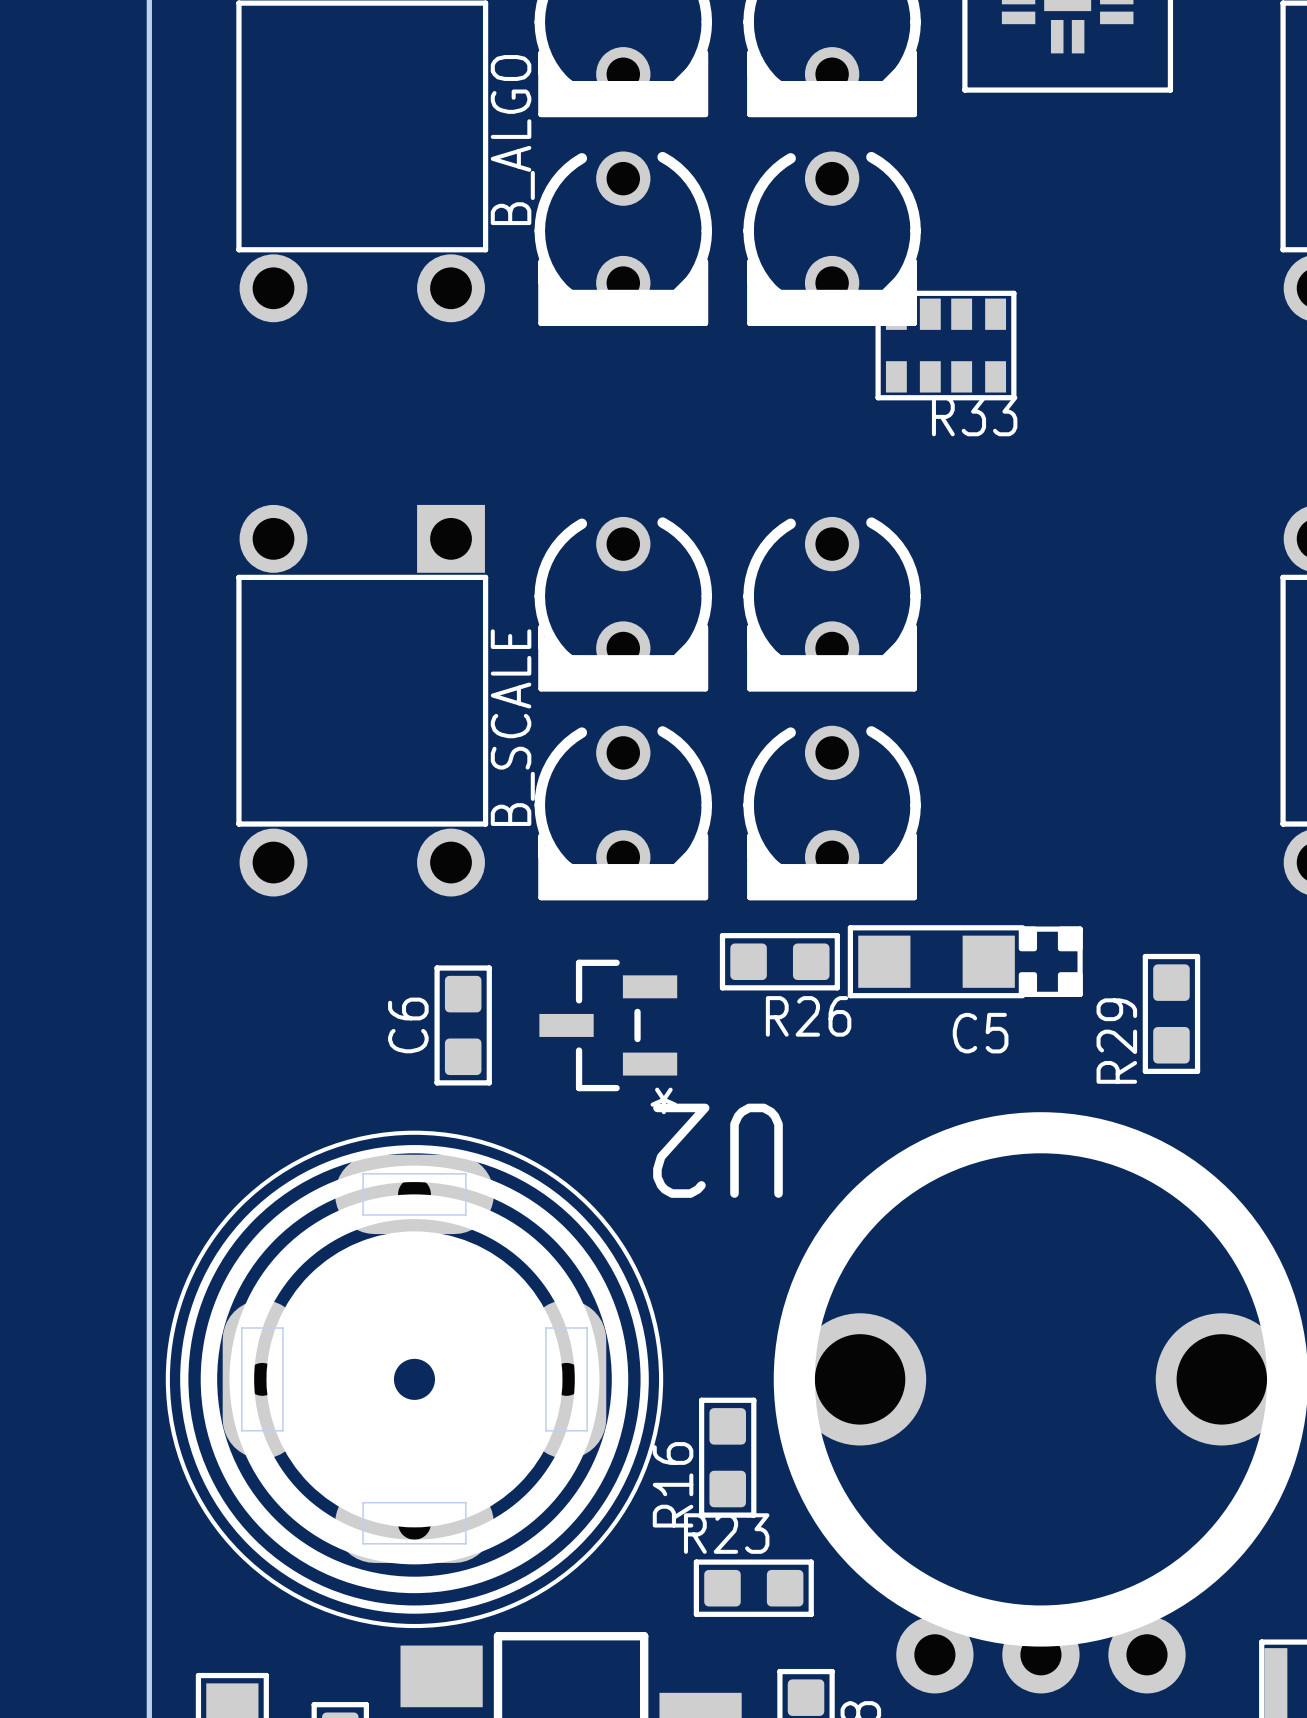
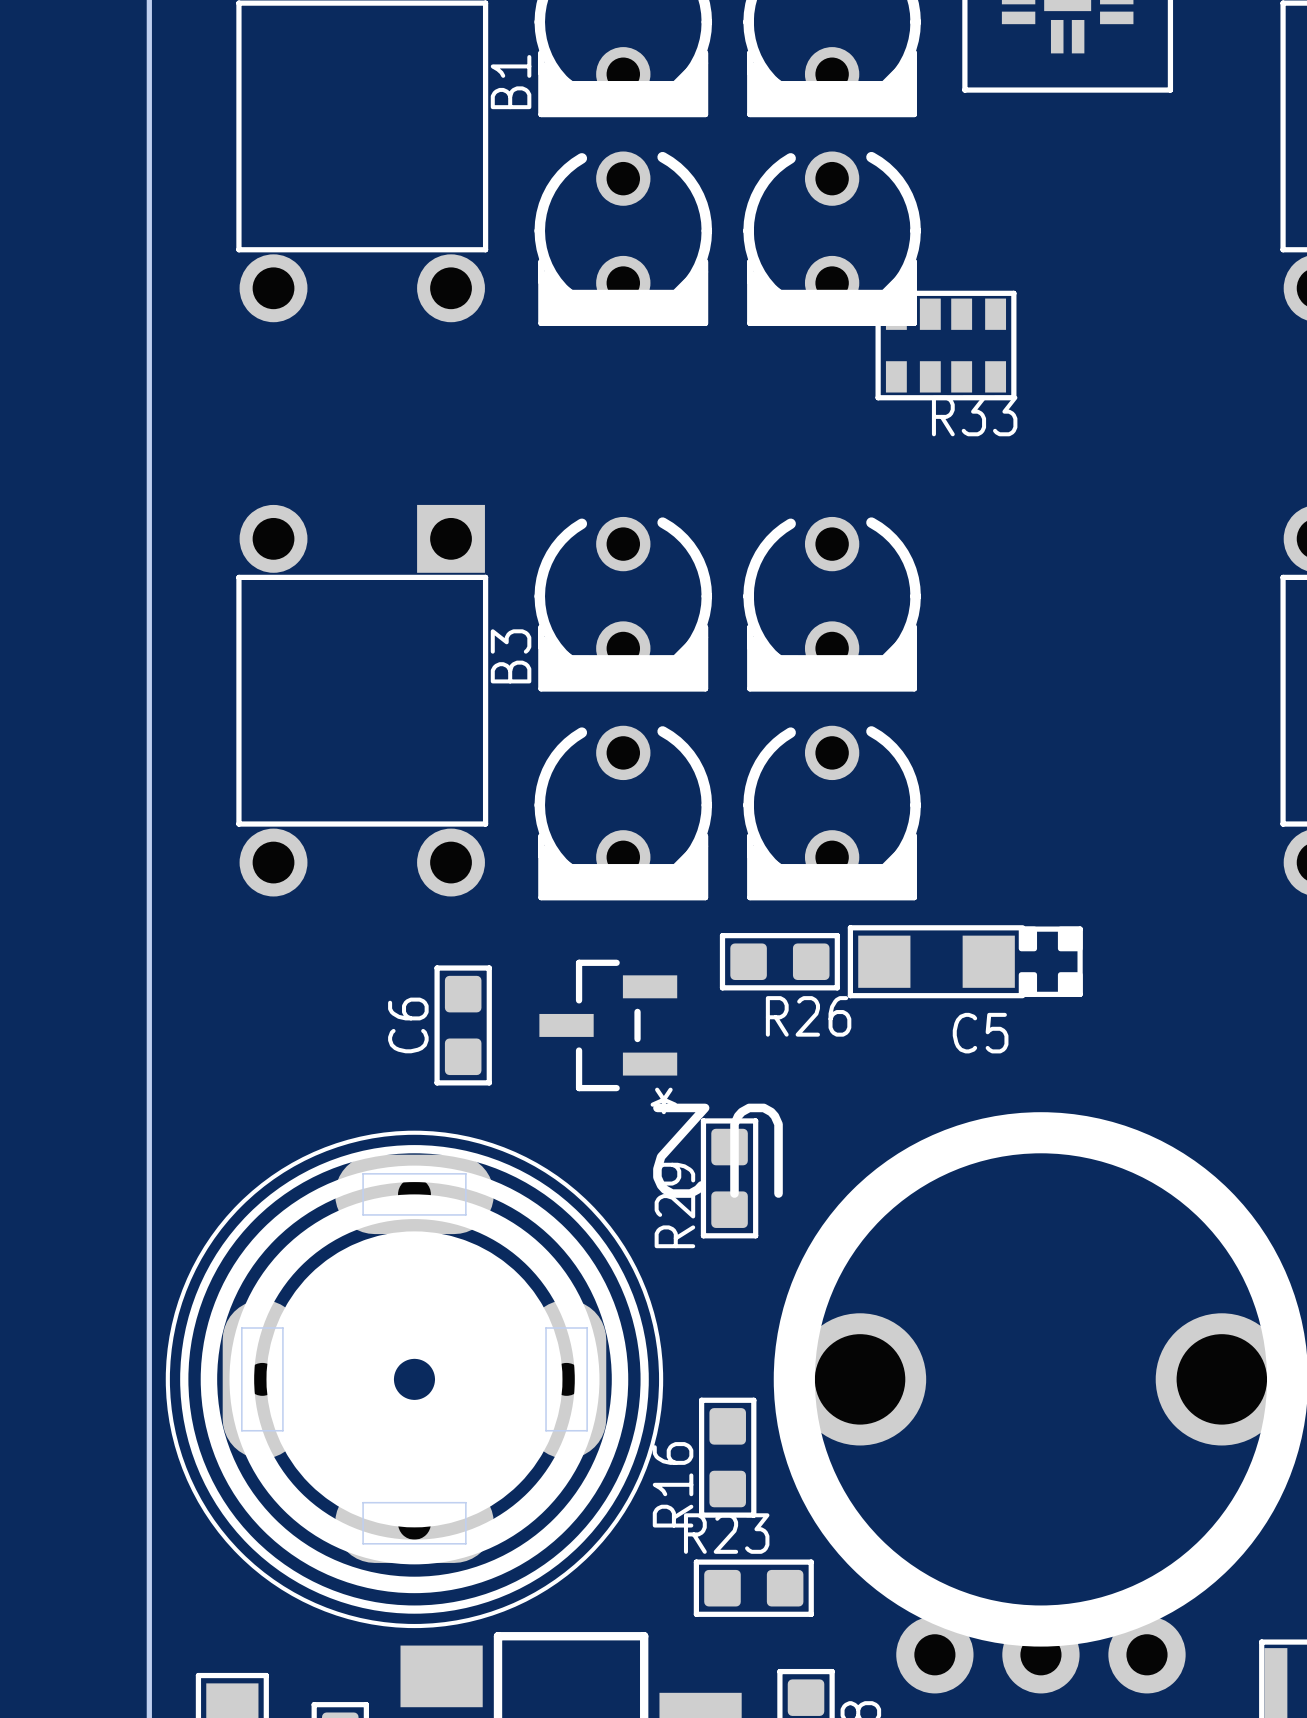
B_ALGO name: B_ALGO (512, 140) -> B1 (511, 82)
B_SCALE name: B_SCALE (512, 727) -> B3 (511, 656)
R29 position: (1171, 1013) -> (729, 1178)

